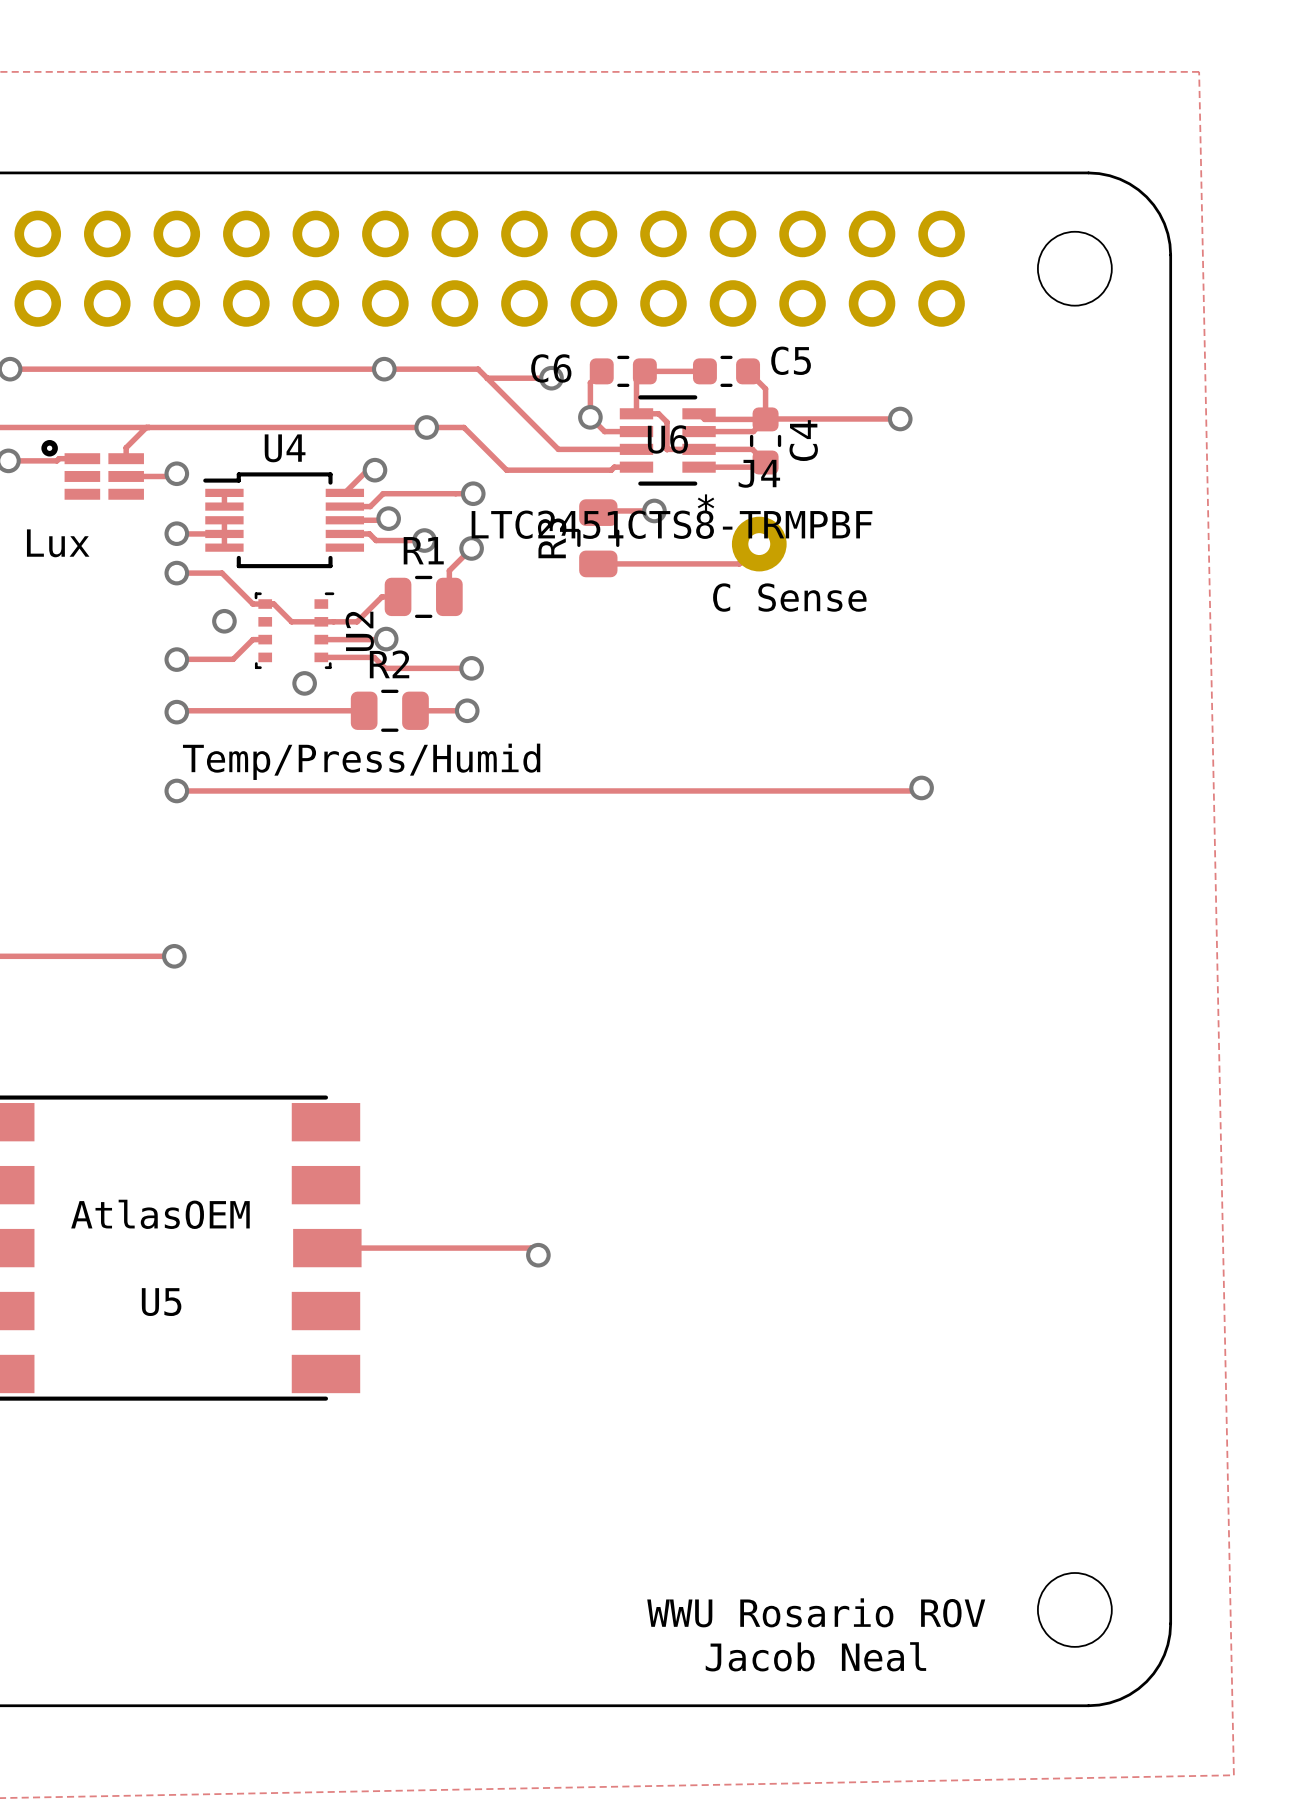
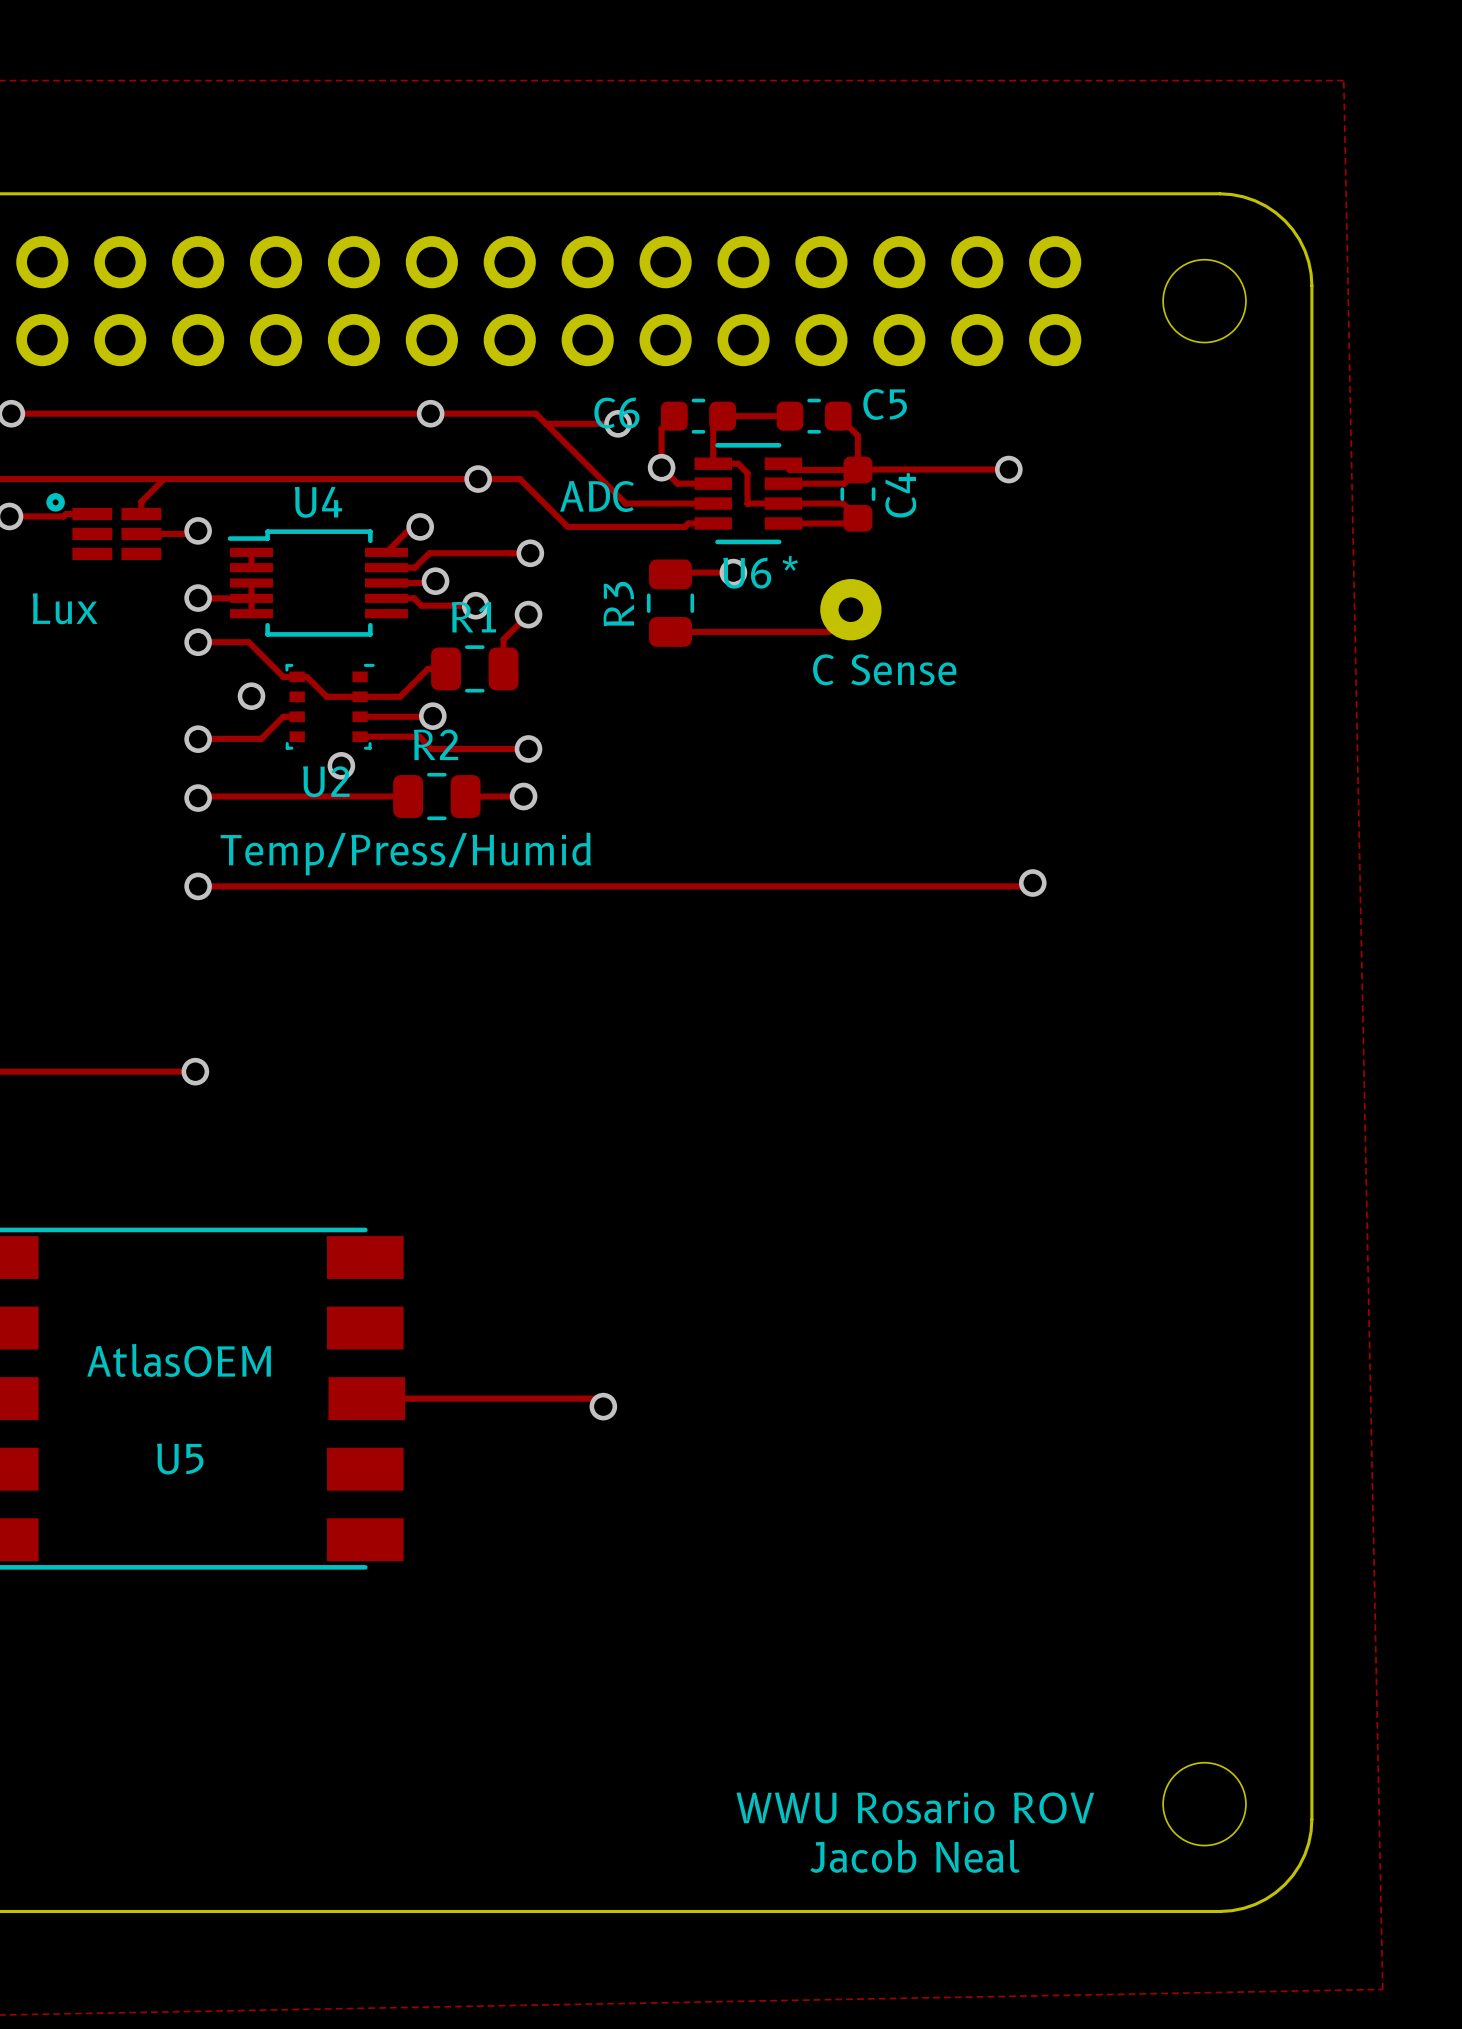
U6 name position: U6 (667, 439) -> U6 (747, 573)
J4 name: J4 (759, 473) -> none
U6 value: LTC2451CTS8-TRMPBF (672, 524) -> ADC (597, 496)
U2 name rotation: 0° (359, 631) -> 90° clockwise (326, 781)
U2 name position: U2 (359, 631) -> U2 (326, 781)

